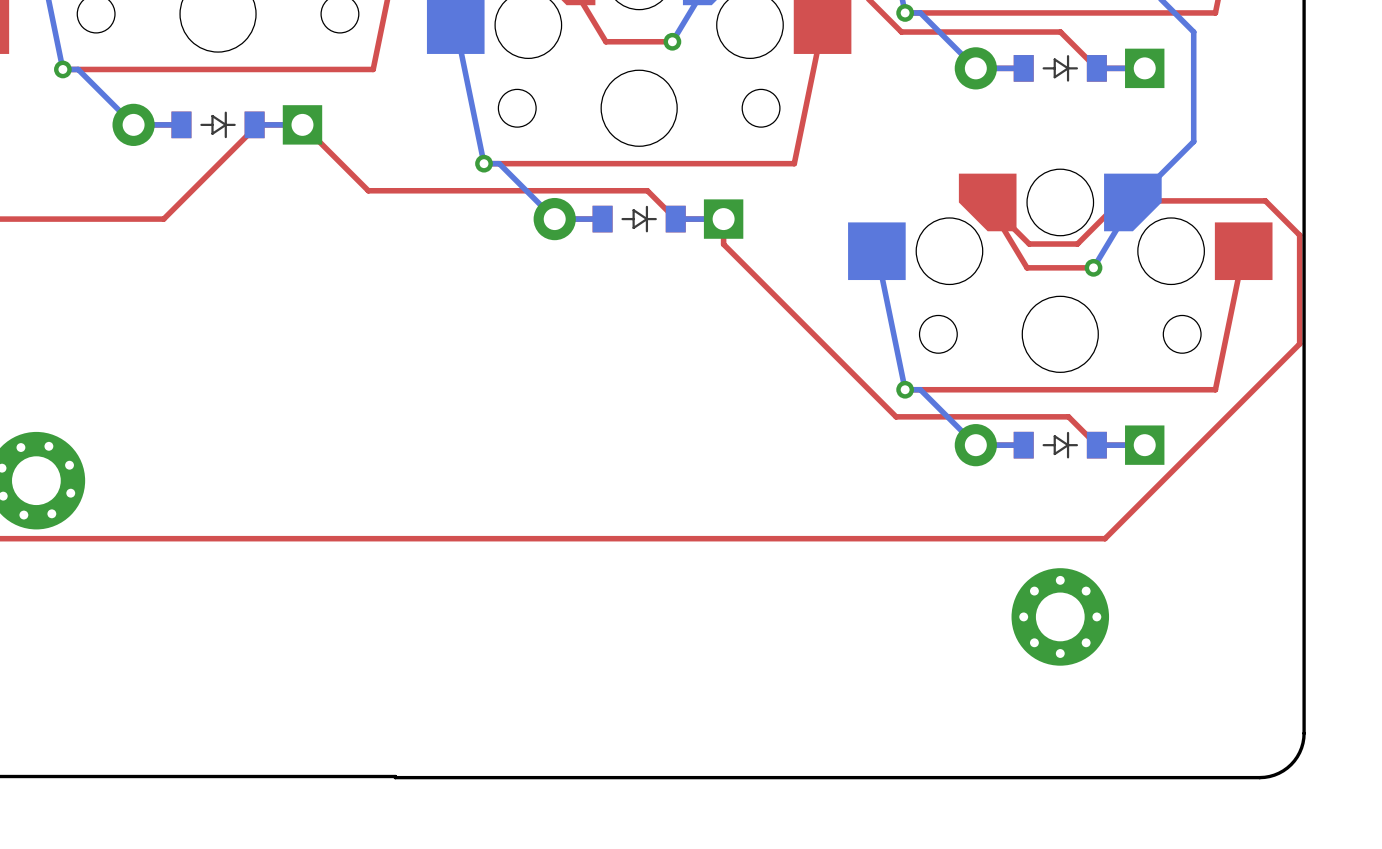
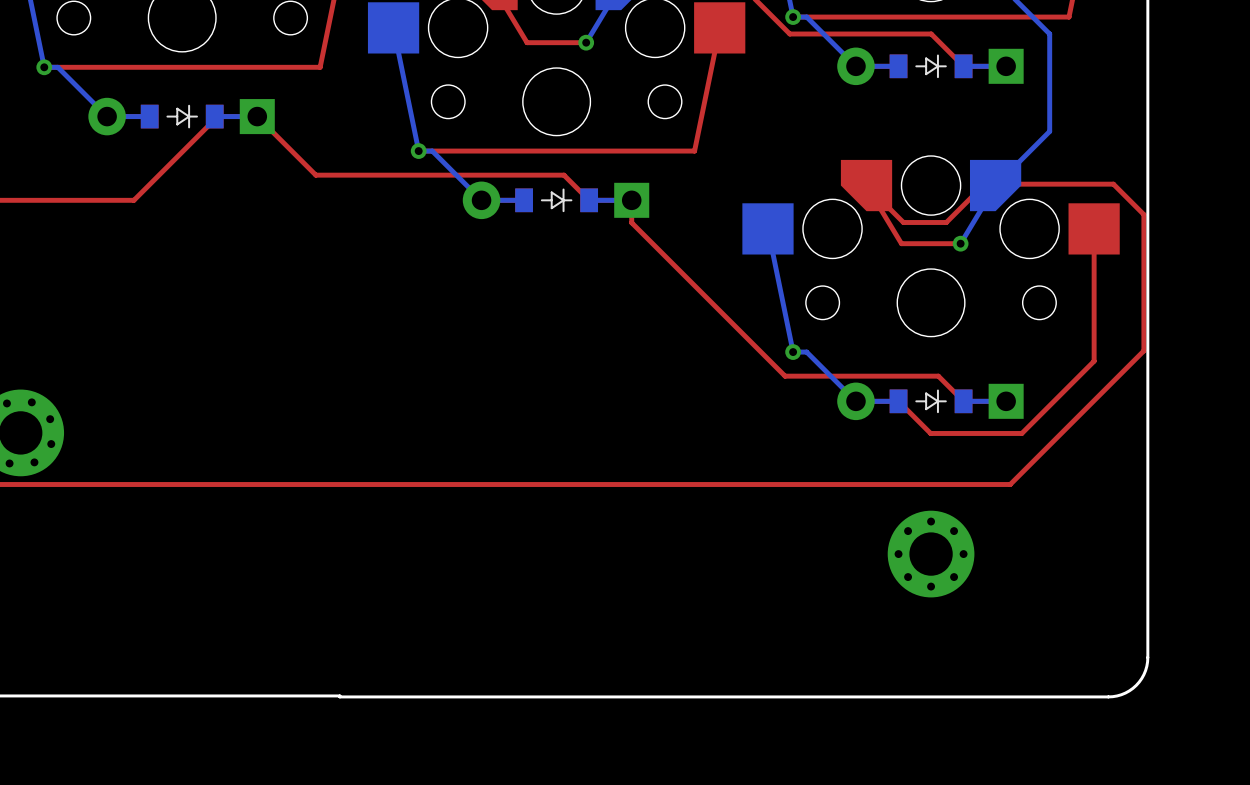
top track: (1243, 251) (1215, 389) (905, 389) -> none
top track: (1299, 344) (1243, 400) -> (1094, 228) (1094, 361)
top track: none -> (1143, 311) (1143, 350) (1010, 484) (970, 484)
top track: (1162, 481) (1105, 538) -> (1021, 433) (930, 433) (898, 401)

